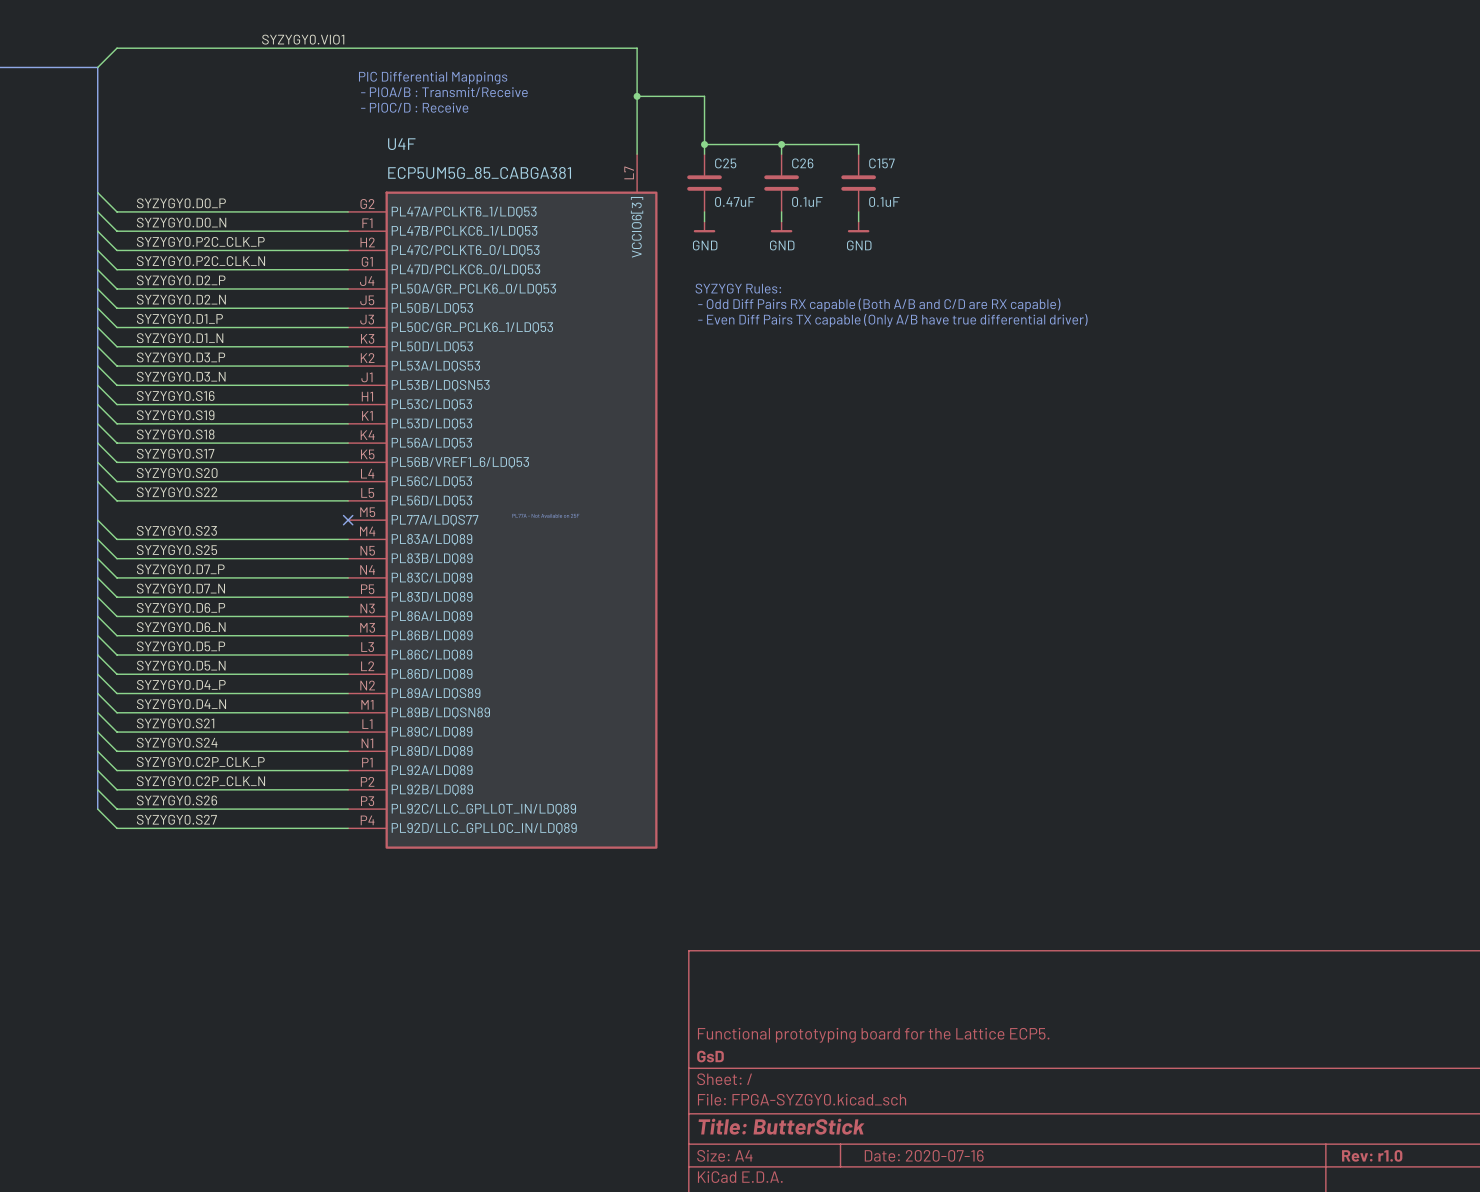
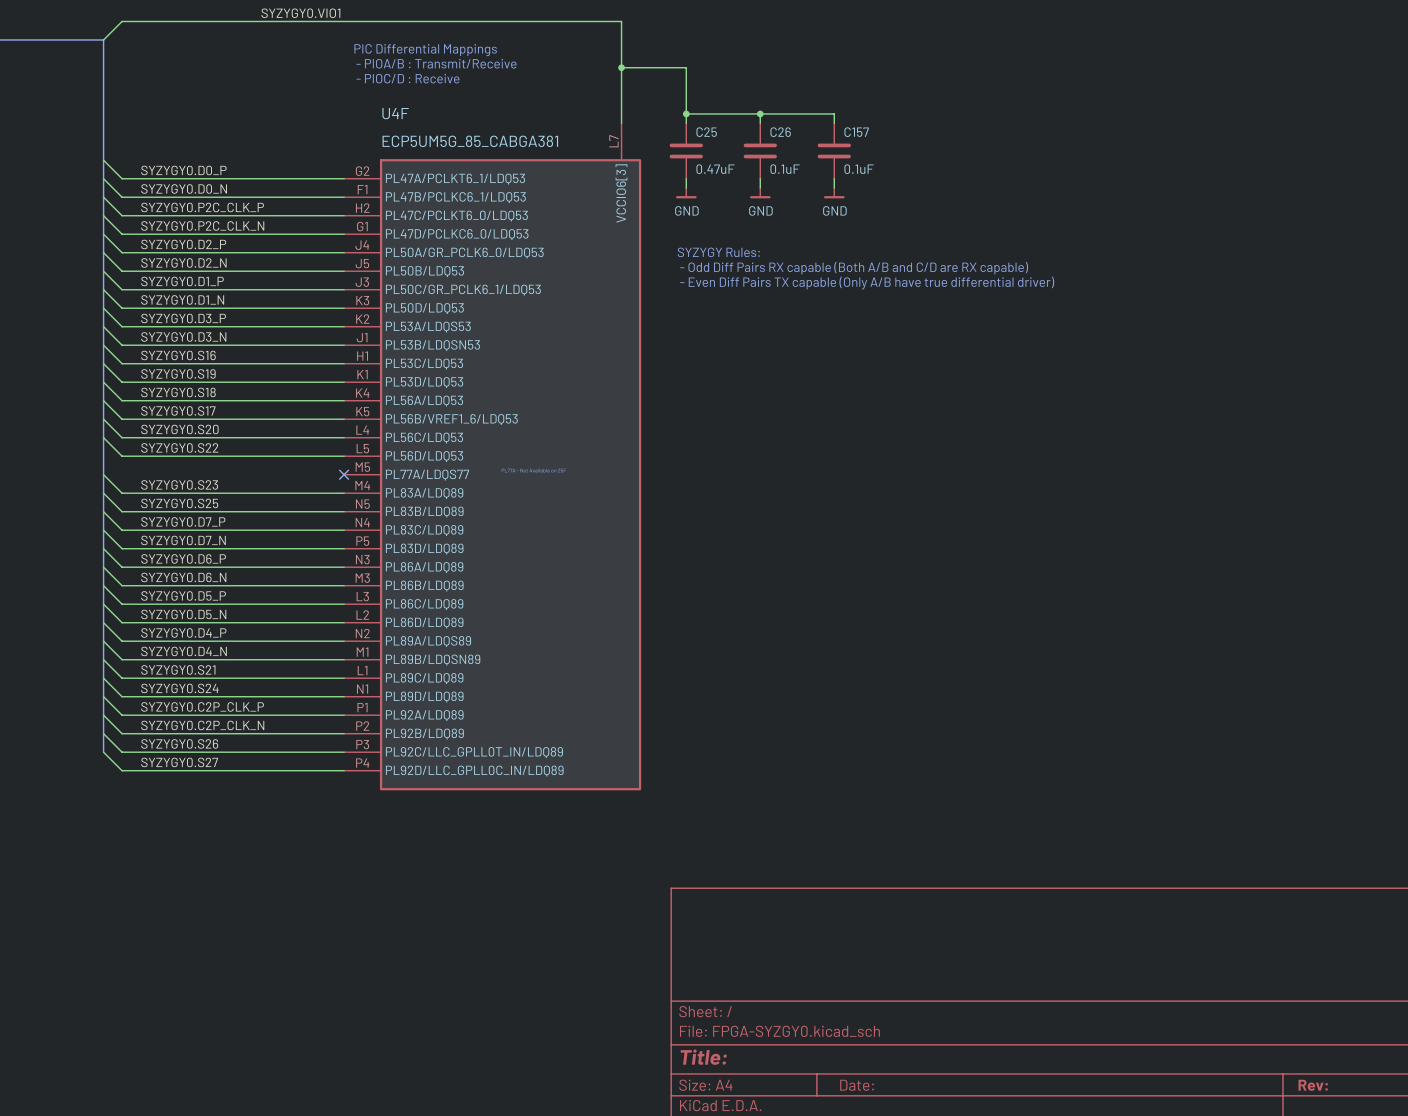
title block: Functional prototyping board for the Lattice ECP5. (873, 1035) -> none
title block: GsD (710, 1056) -> none
title block: Title: ButterStick (781, 1126) -> Title: (703, 1057)
title block: Date: 2020-07-16 (924, 1155) -> Date: (857, 1085)
title block: Rev: r1.0 (1372, 1155) -> Rev: (1313, 1085)

